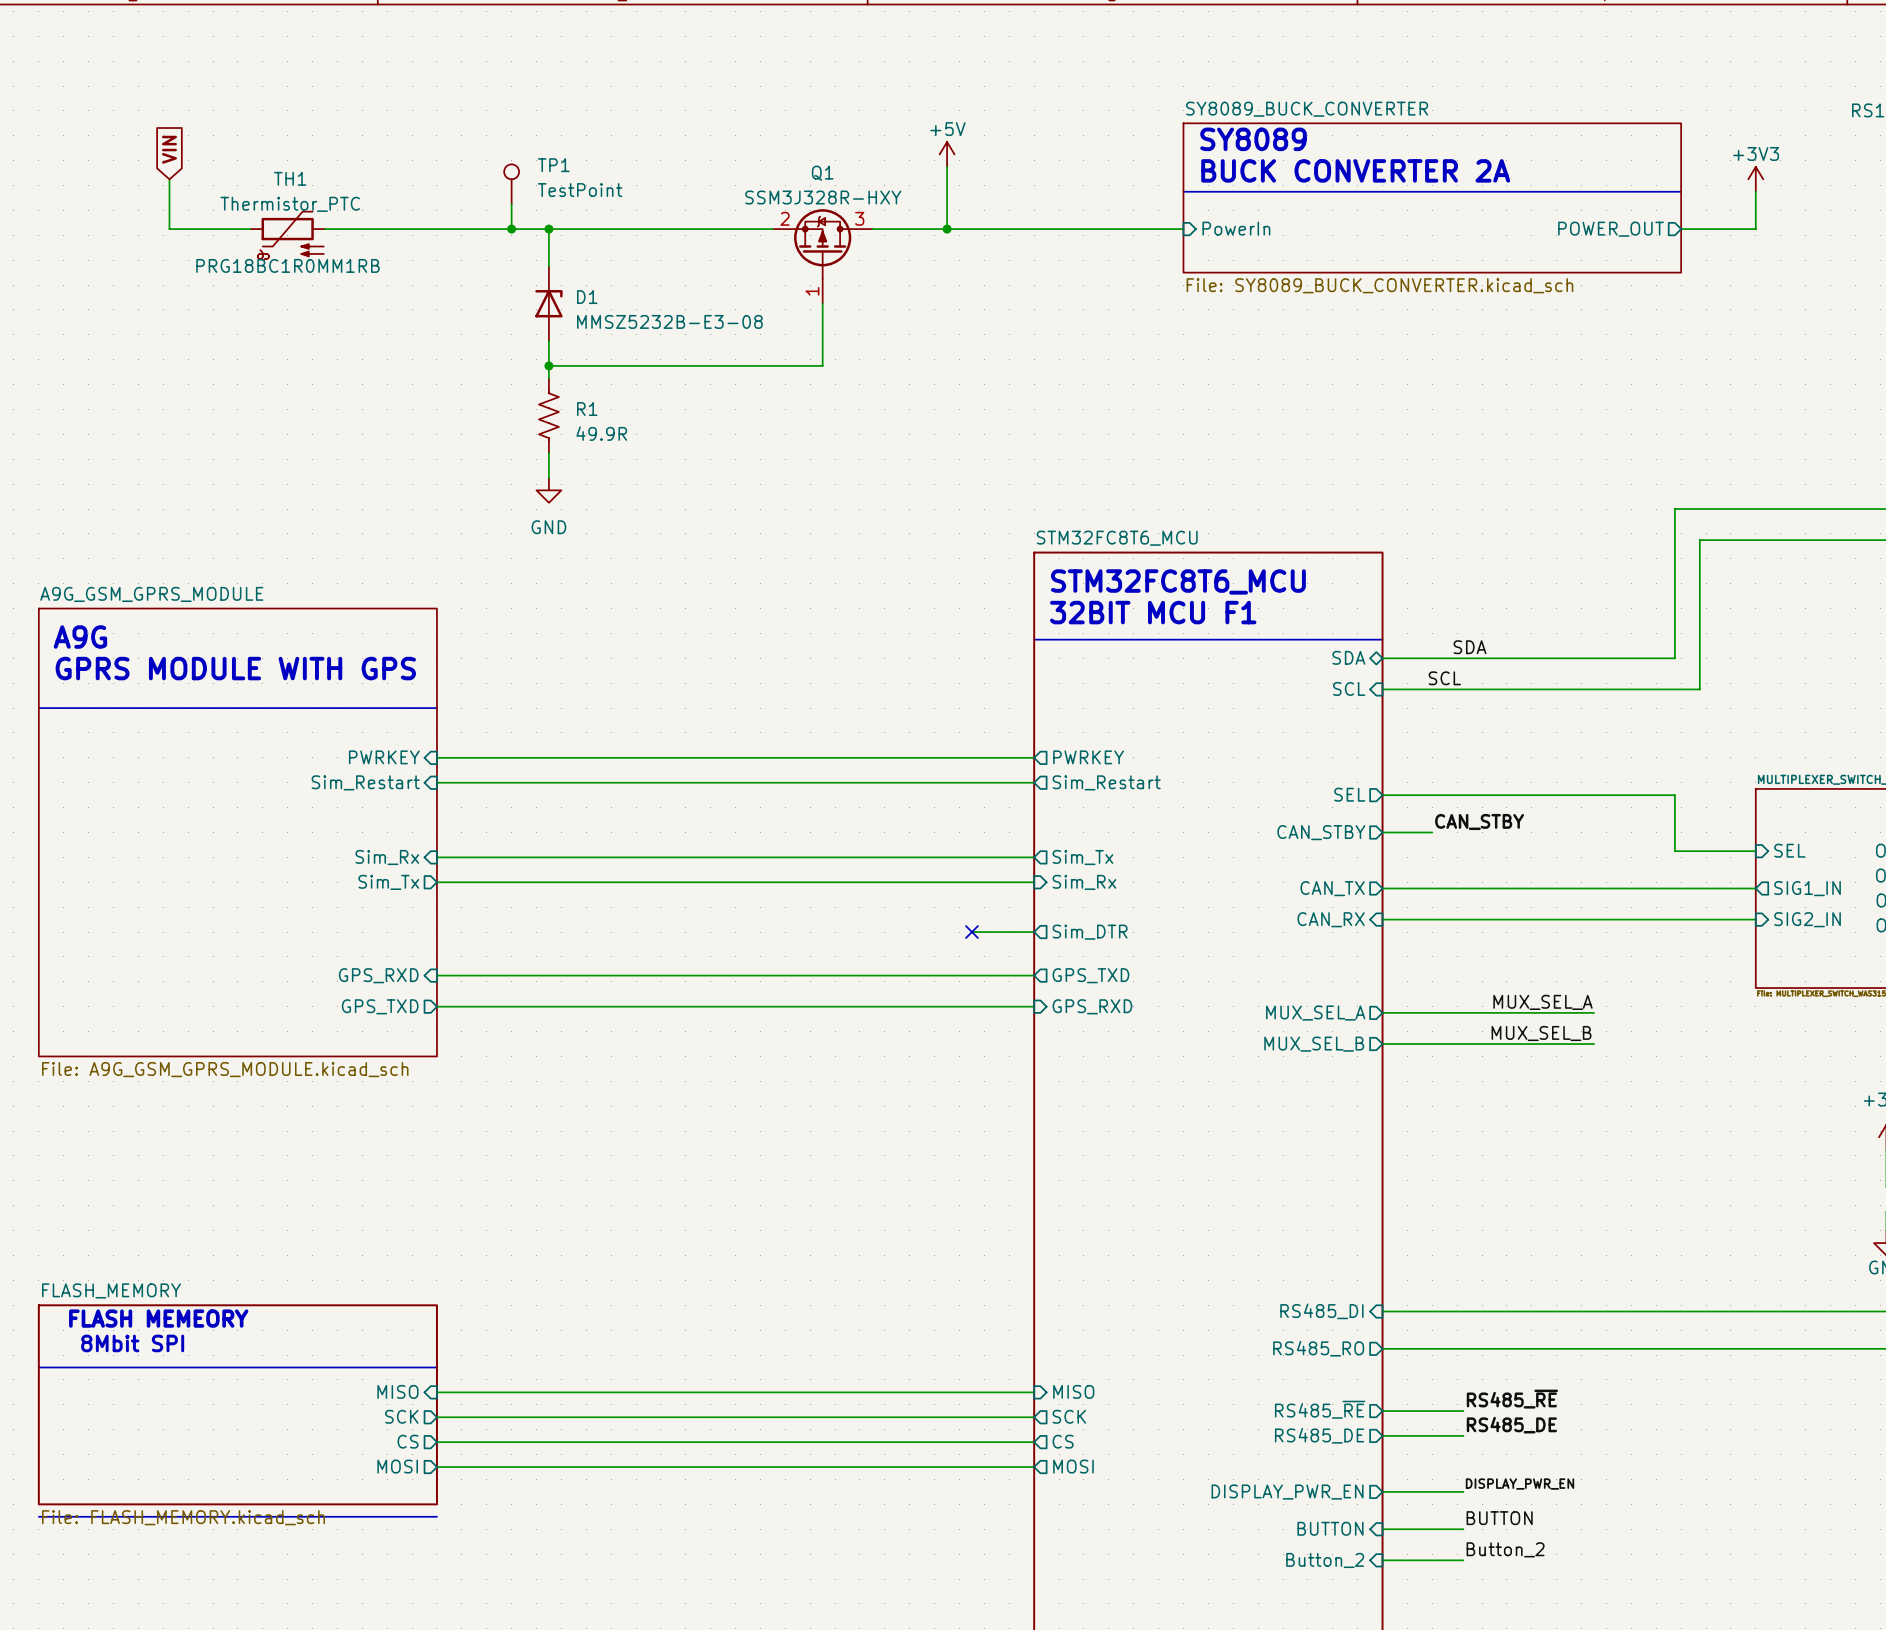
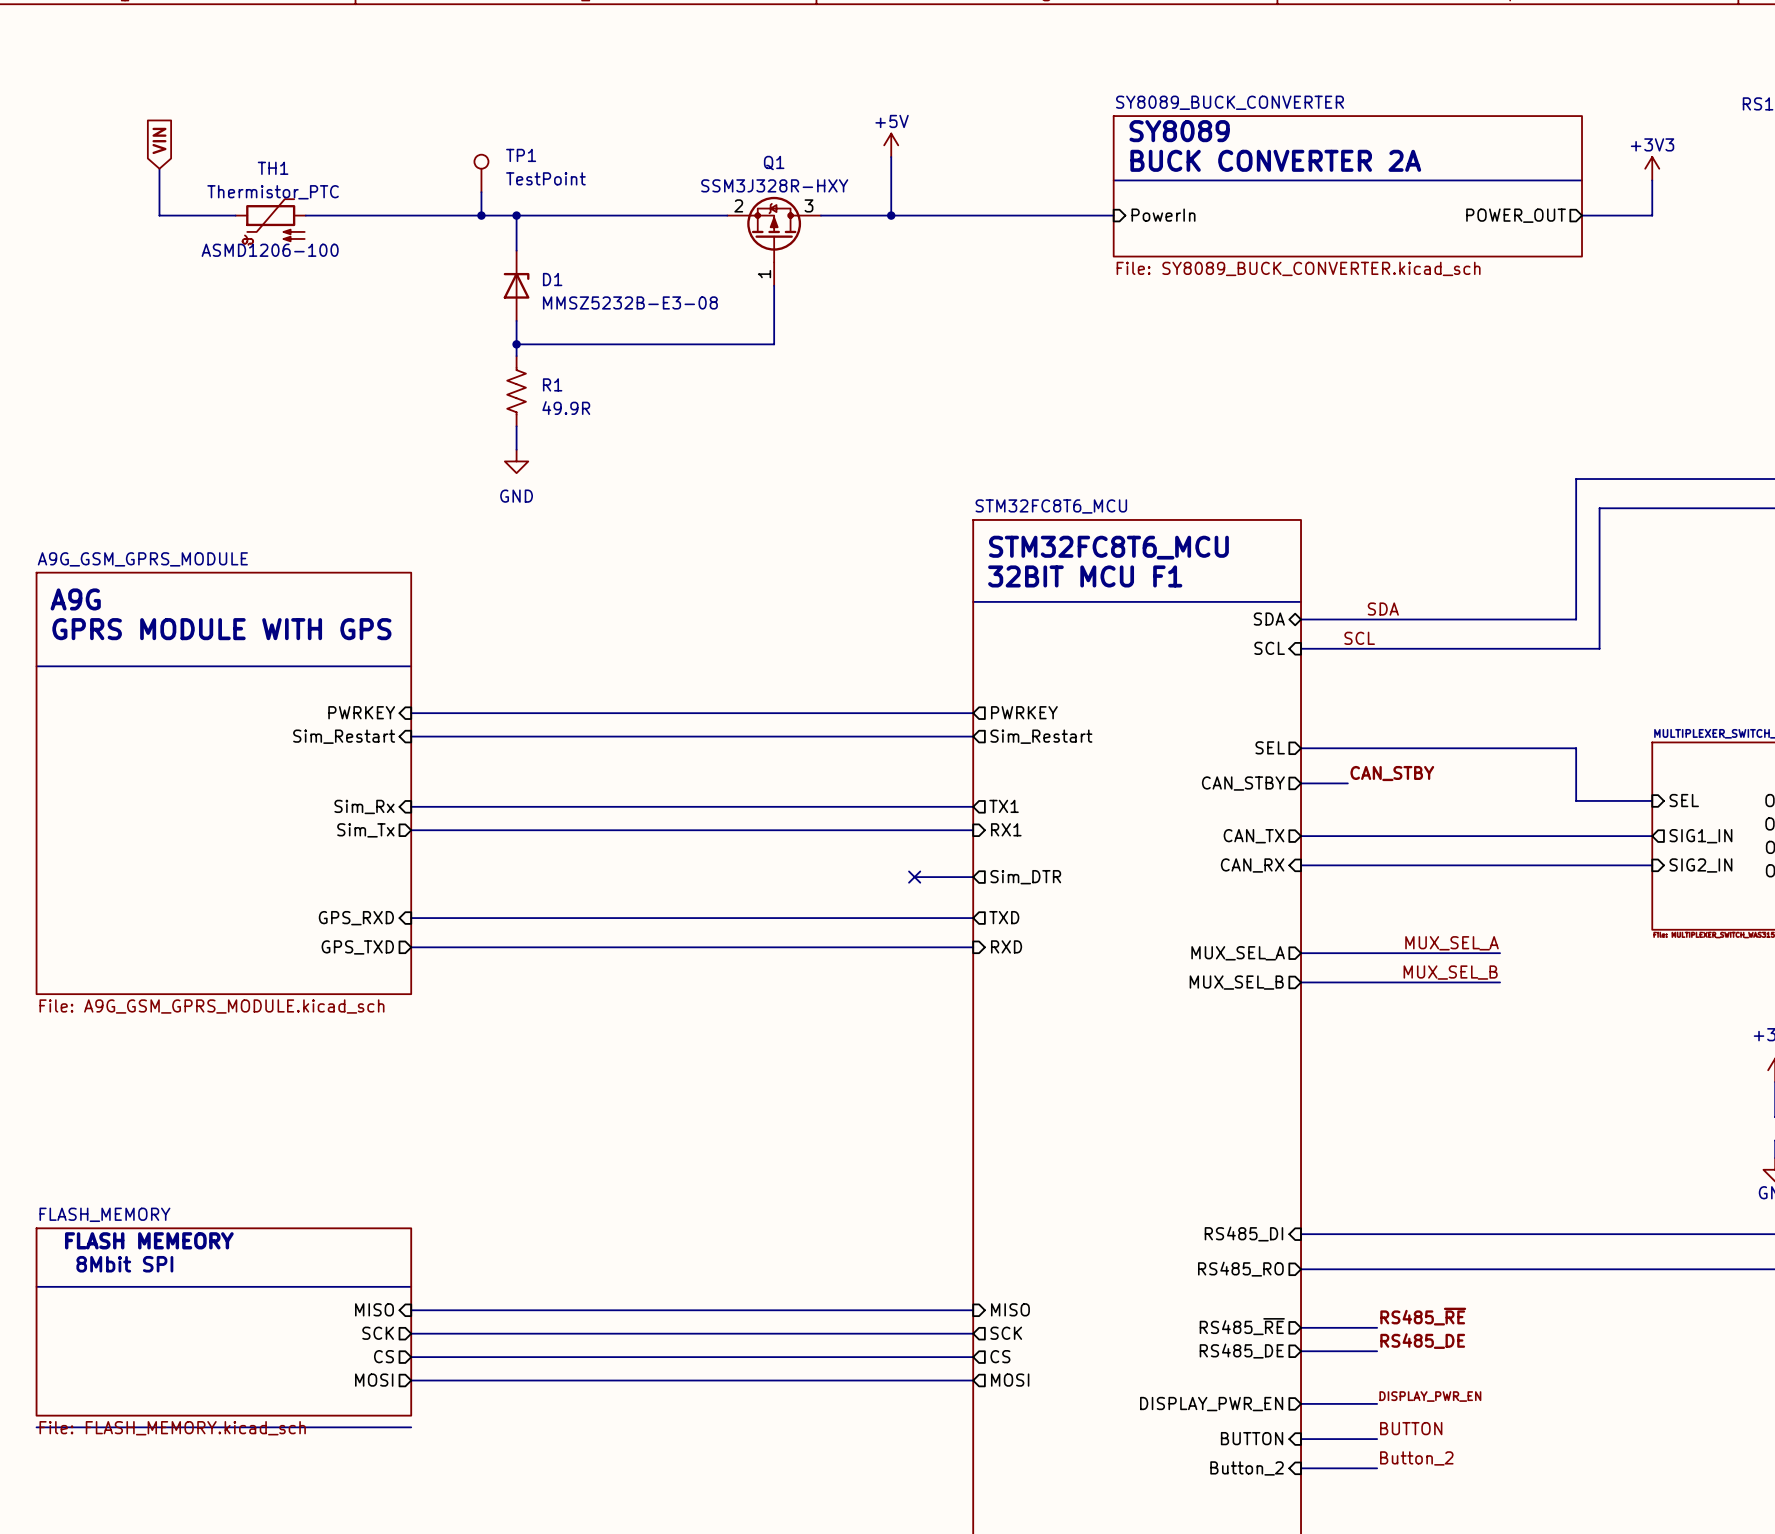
TH1 text: PRG18BC1R0MM1RB (287, 265) -> ASMD1206-100 (270, 250)
sheet pin: Sim_Tx (1082, 857) -> TX1 (1004, 806)
sheet pin: Sim_Rx (1084, 882) -> RX1 (1006, 829)
sheet pin: GPS_TXD (1090, 975) -> TXD (1004, 917)
sheet pin: GPS_RXD (1092, 1006) -> RXD (1006, 946)

